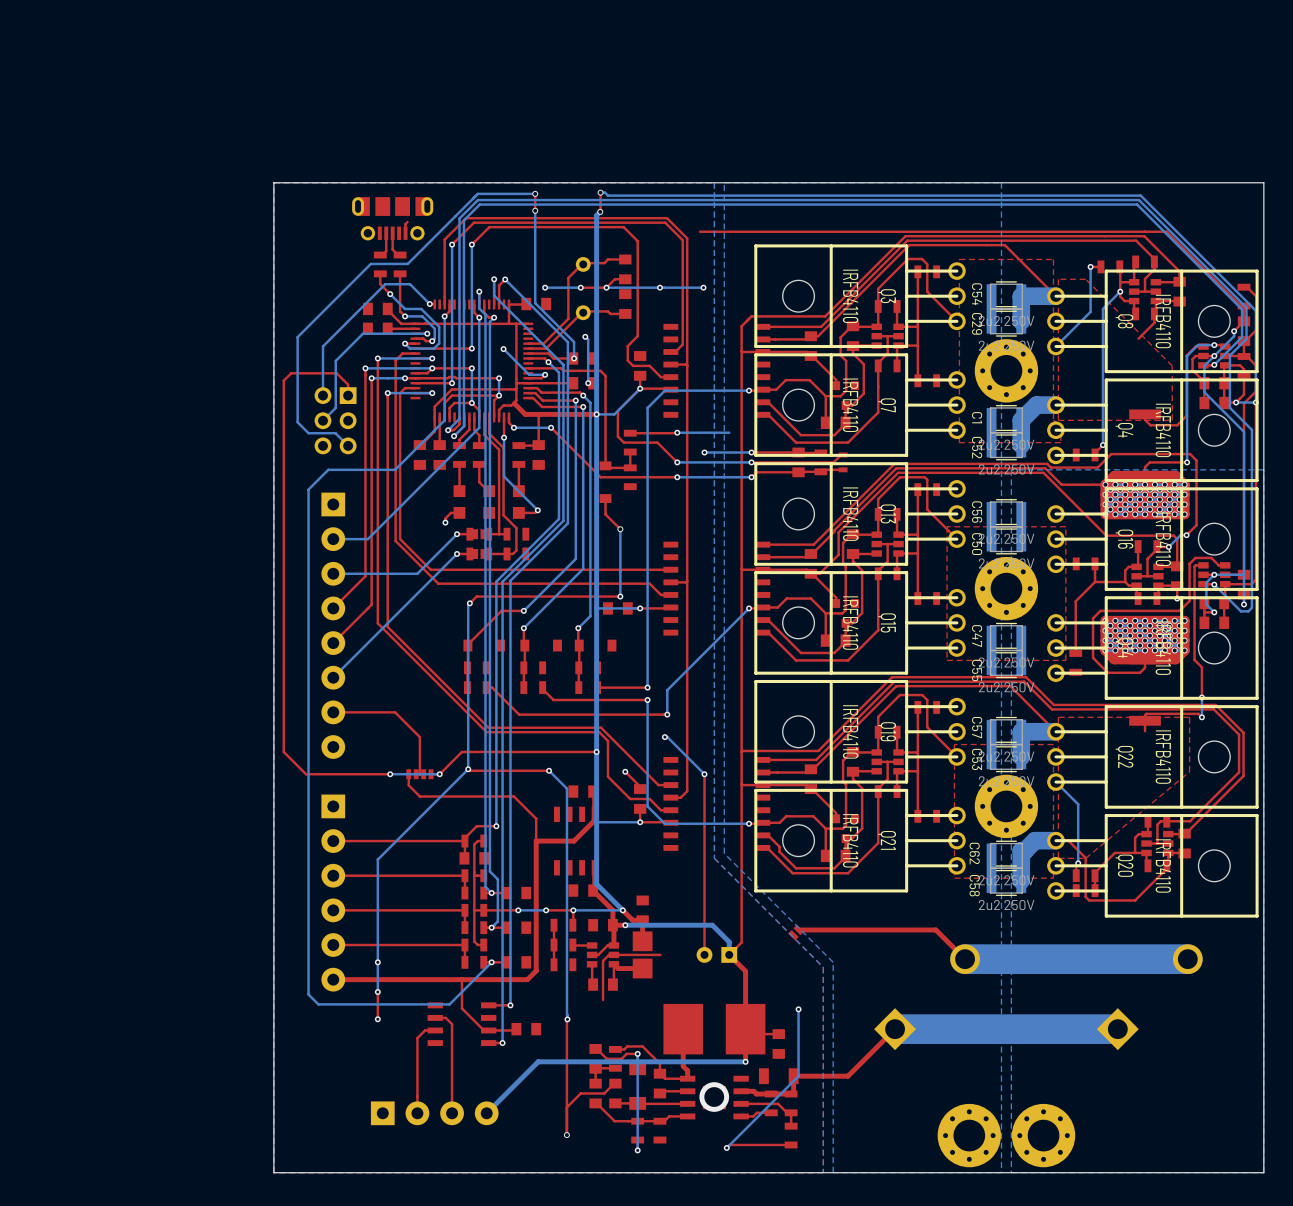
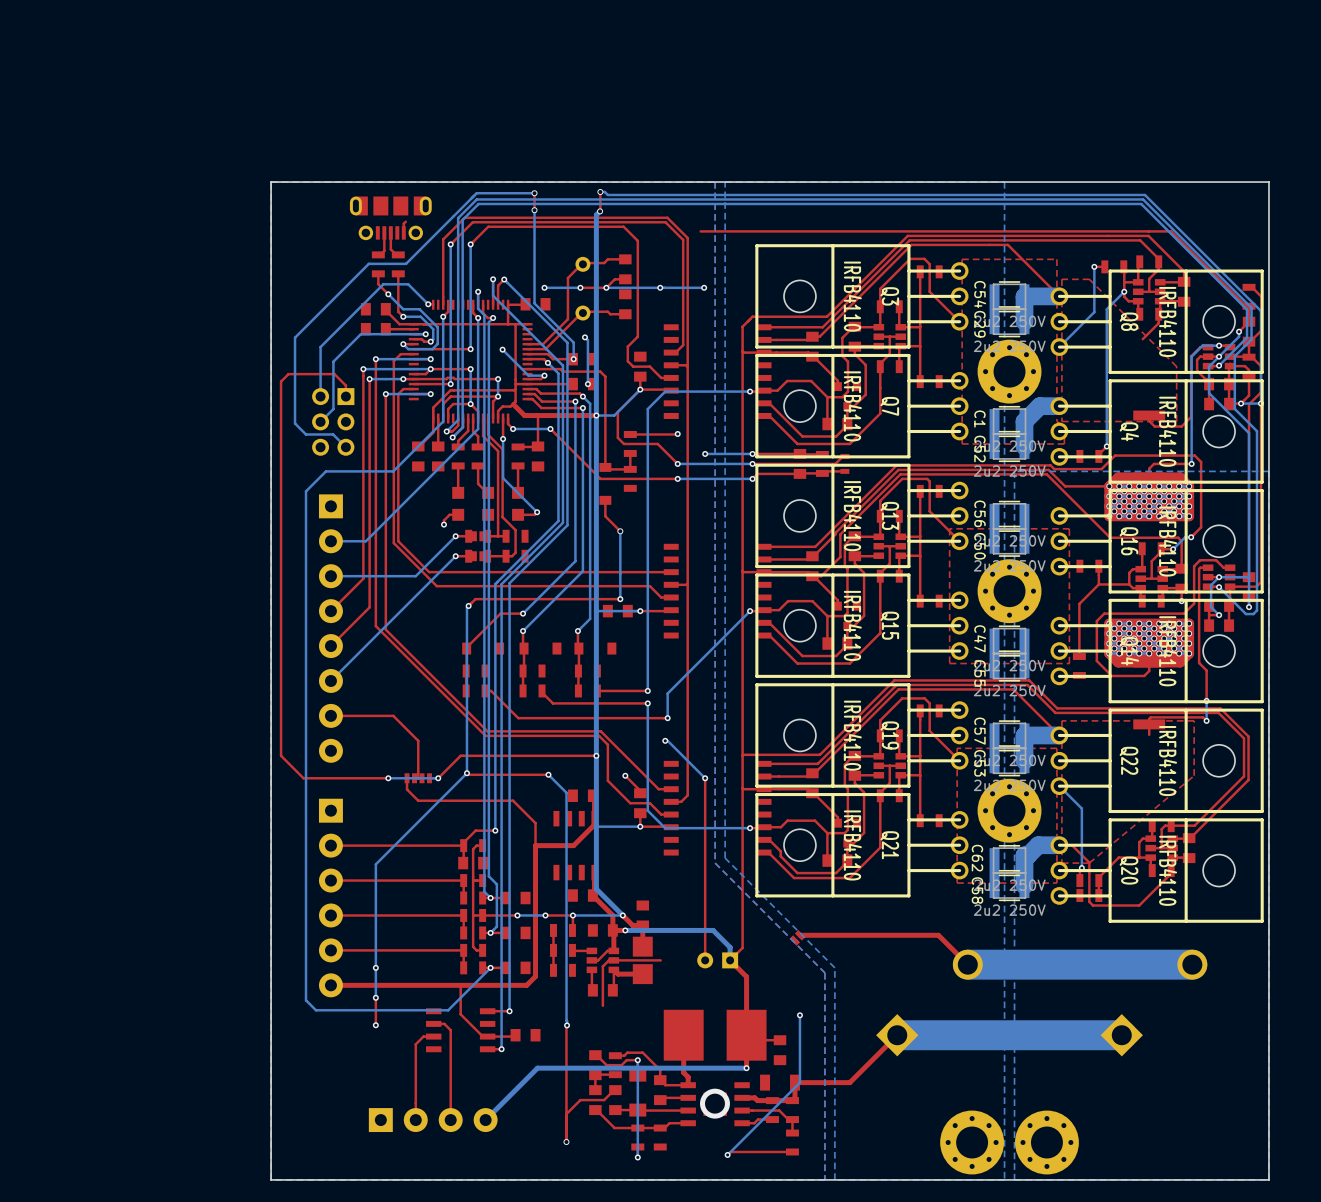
bottom track: (729, 432) (677, 432) -> none

